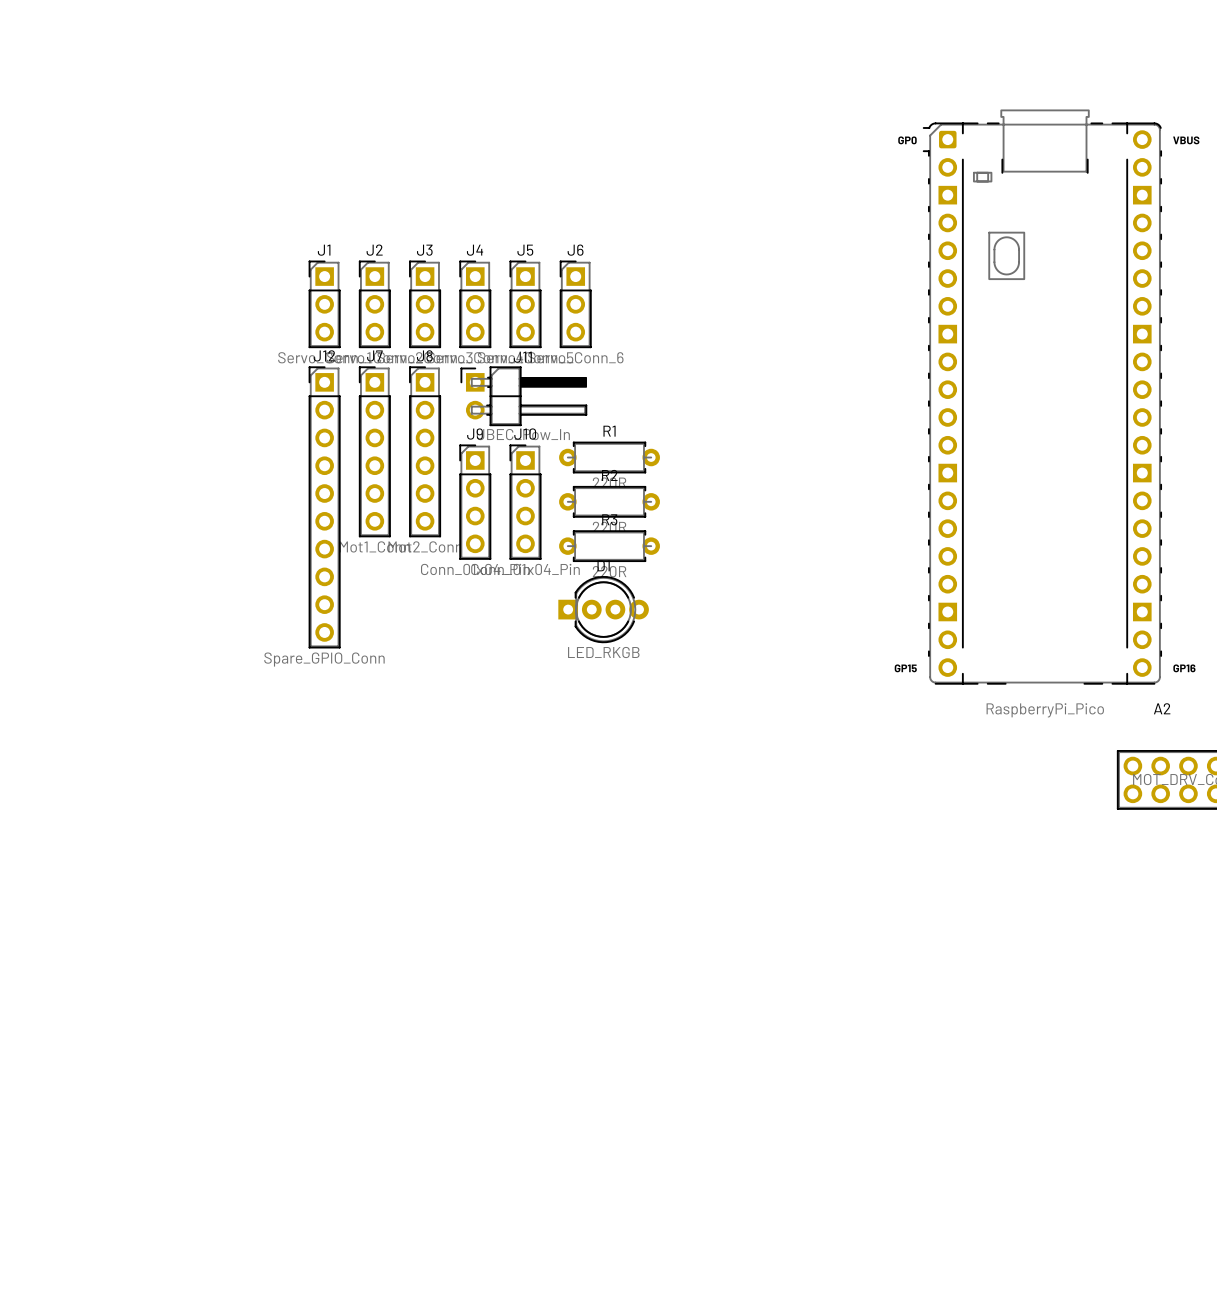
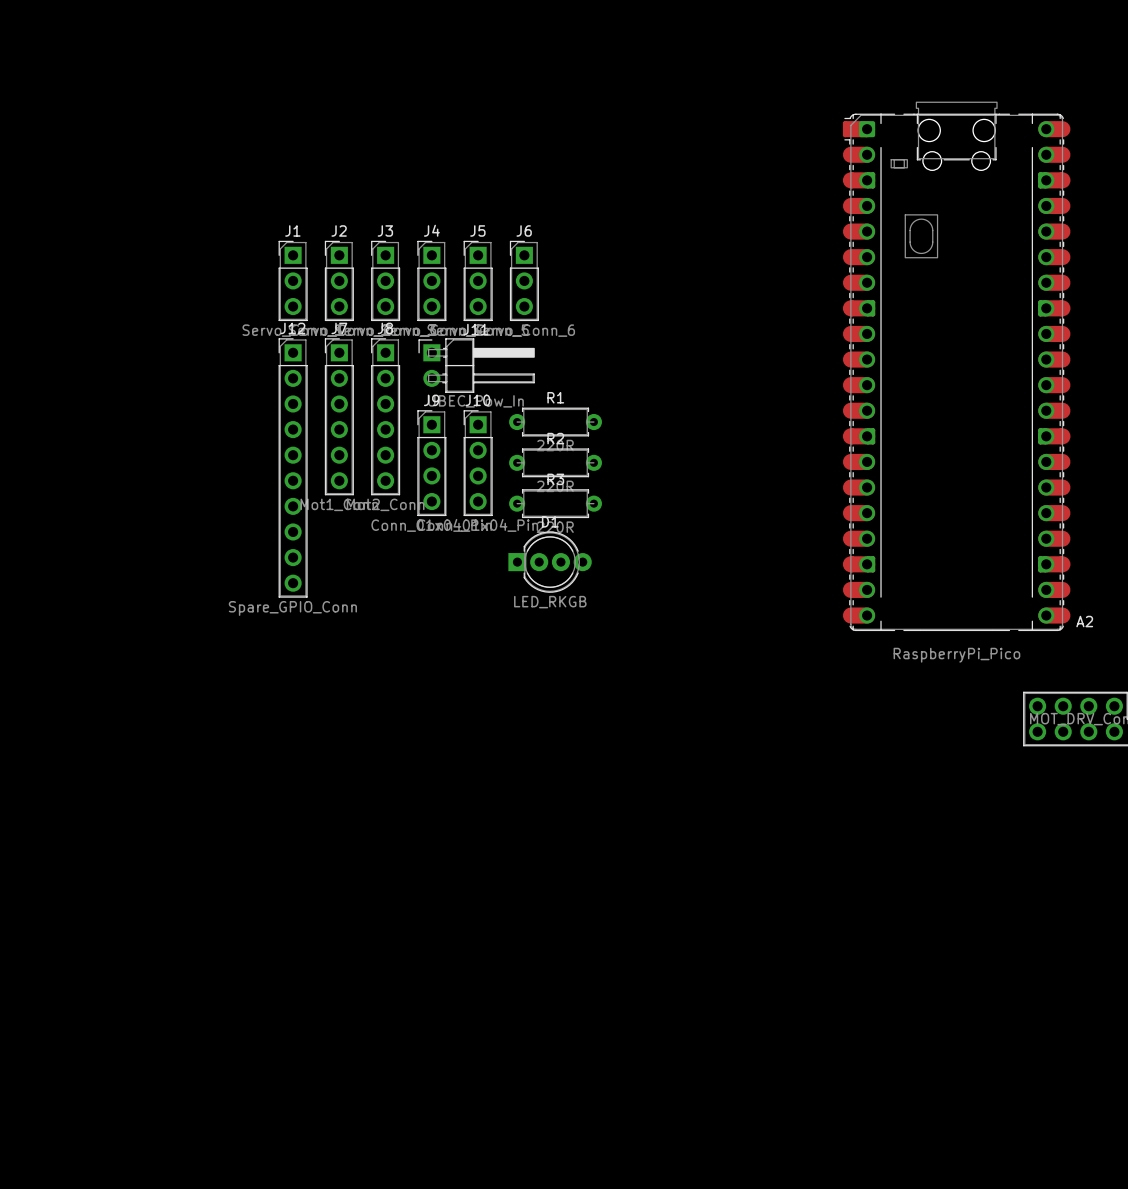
A2 footprint: [923, 109, 1162, 685] -> [842, 101, 1071, 632]
A2 name position: A2 (1162, 708) -> A2 (1084, 621)

